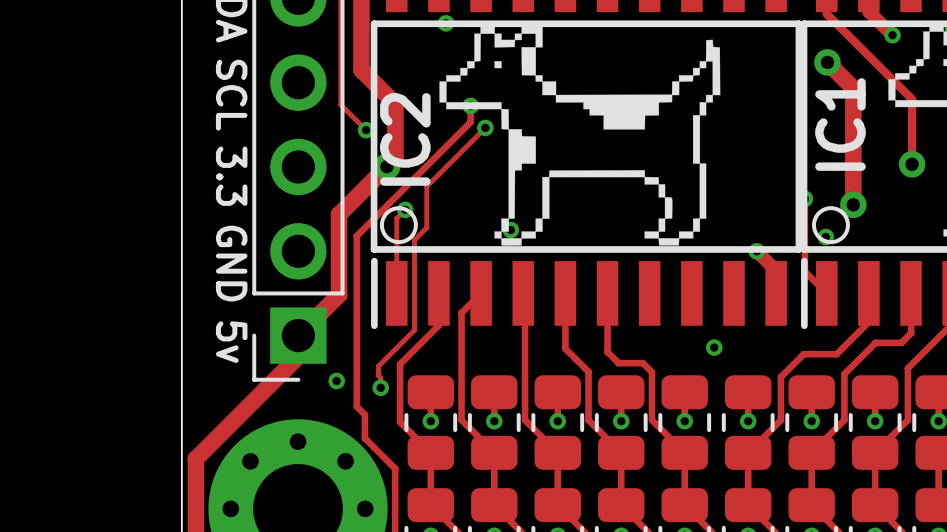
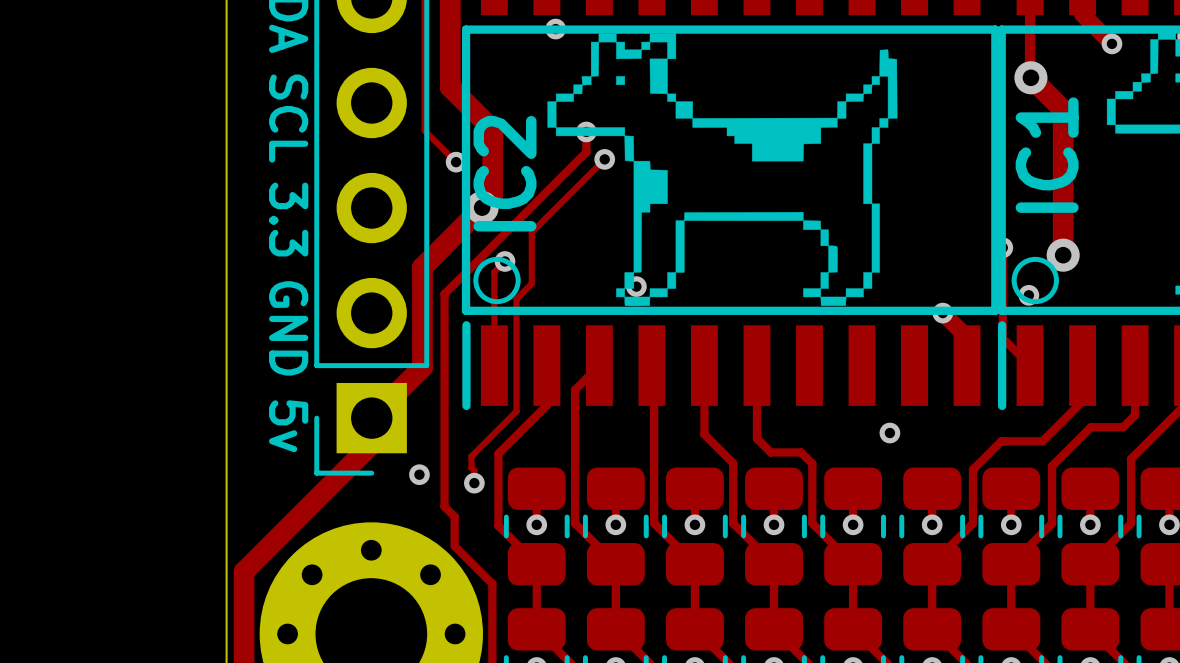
track: (826, 13) (912, 99) (912, 164) -> (1030, 17) (1030, 77)
via: (912, 164) -> none

